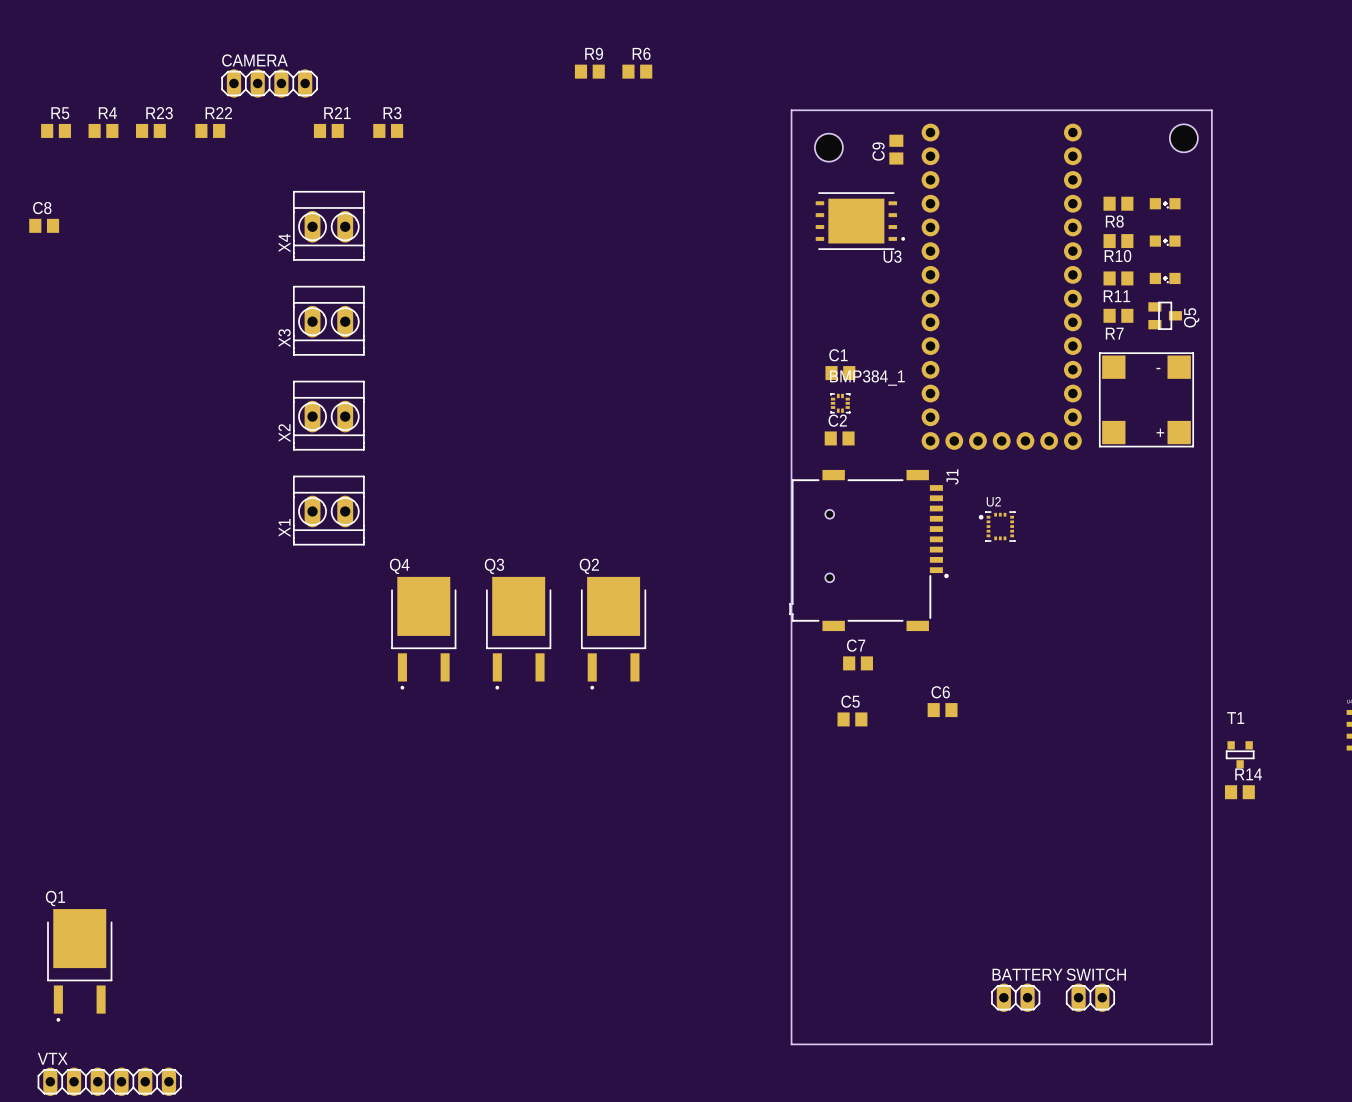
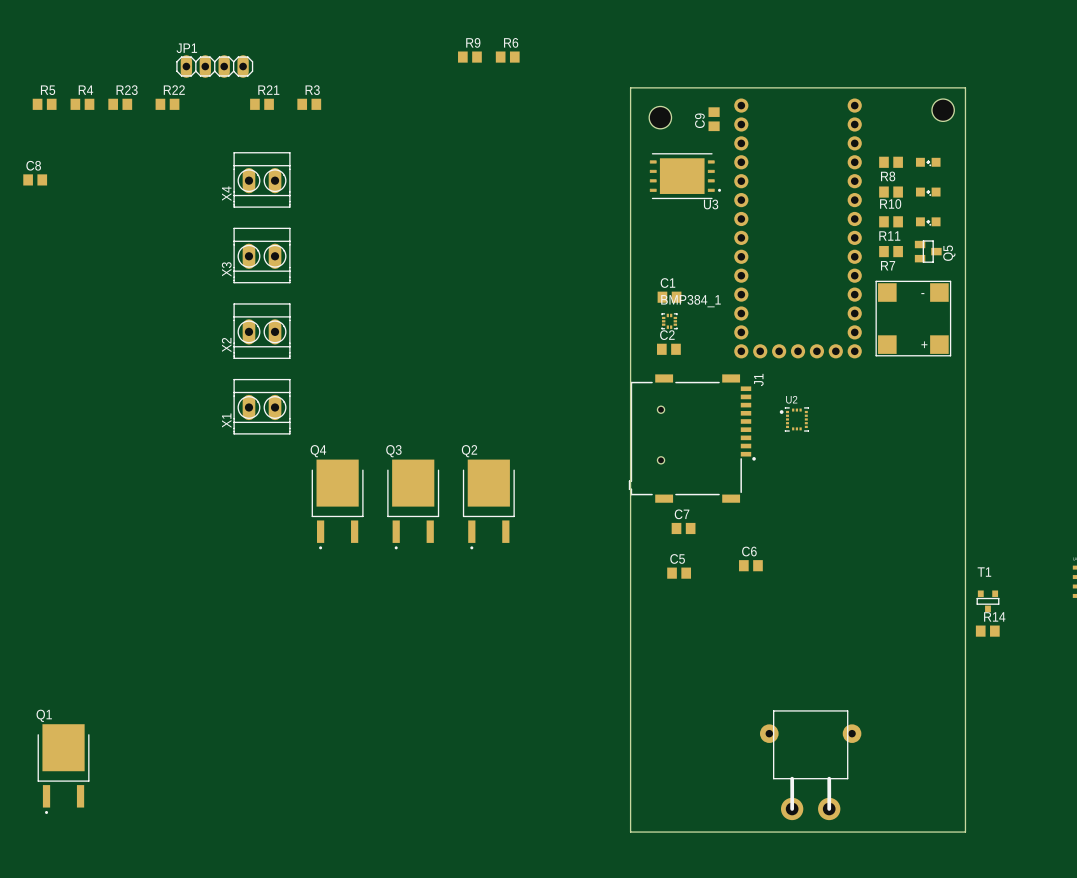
CAMERA name: CAMERA (254, 60) -> JP1 (186, 48)
part: none -> (810, 765)
BATTERY: (1015, 997) -> none
SWITCH: (1090, 997) -> none
VTX: (109, 1081) -> none

